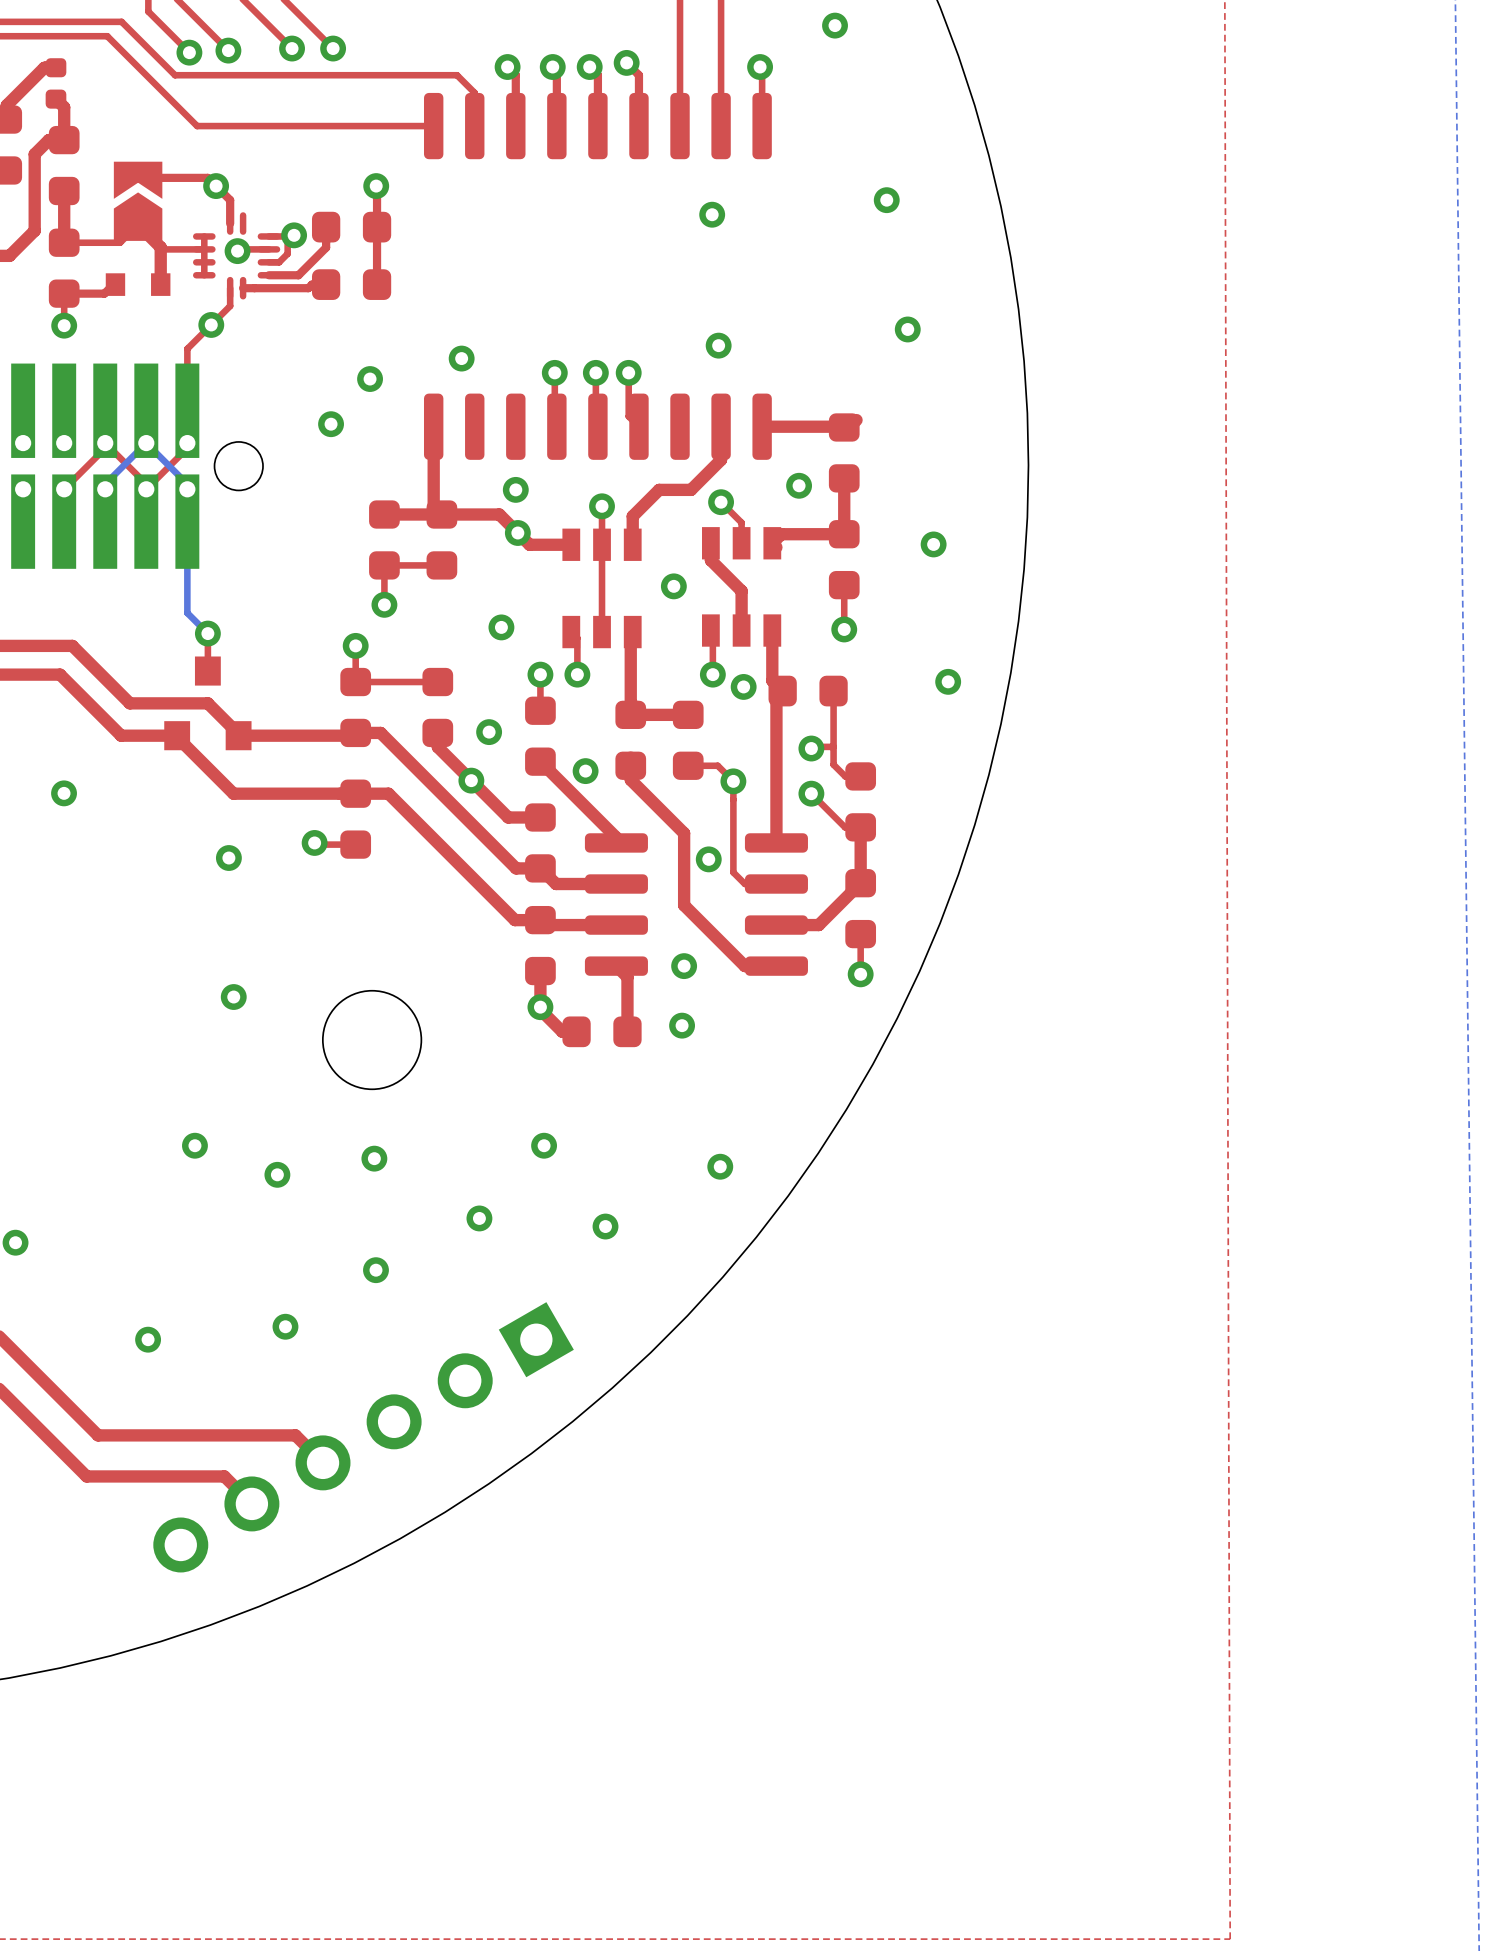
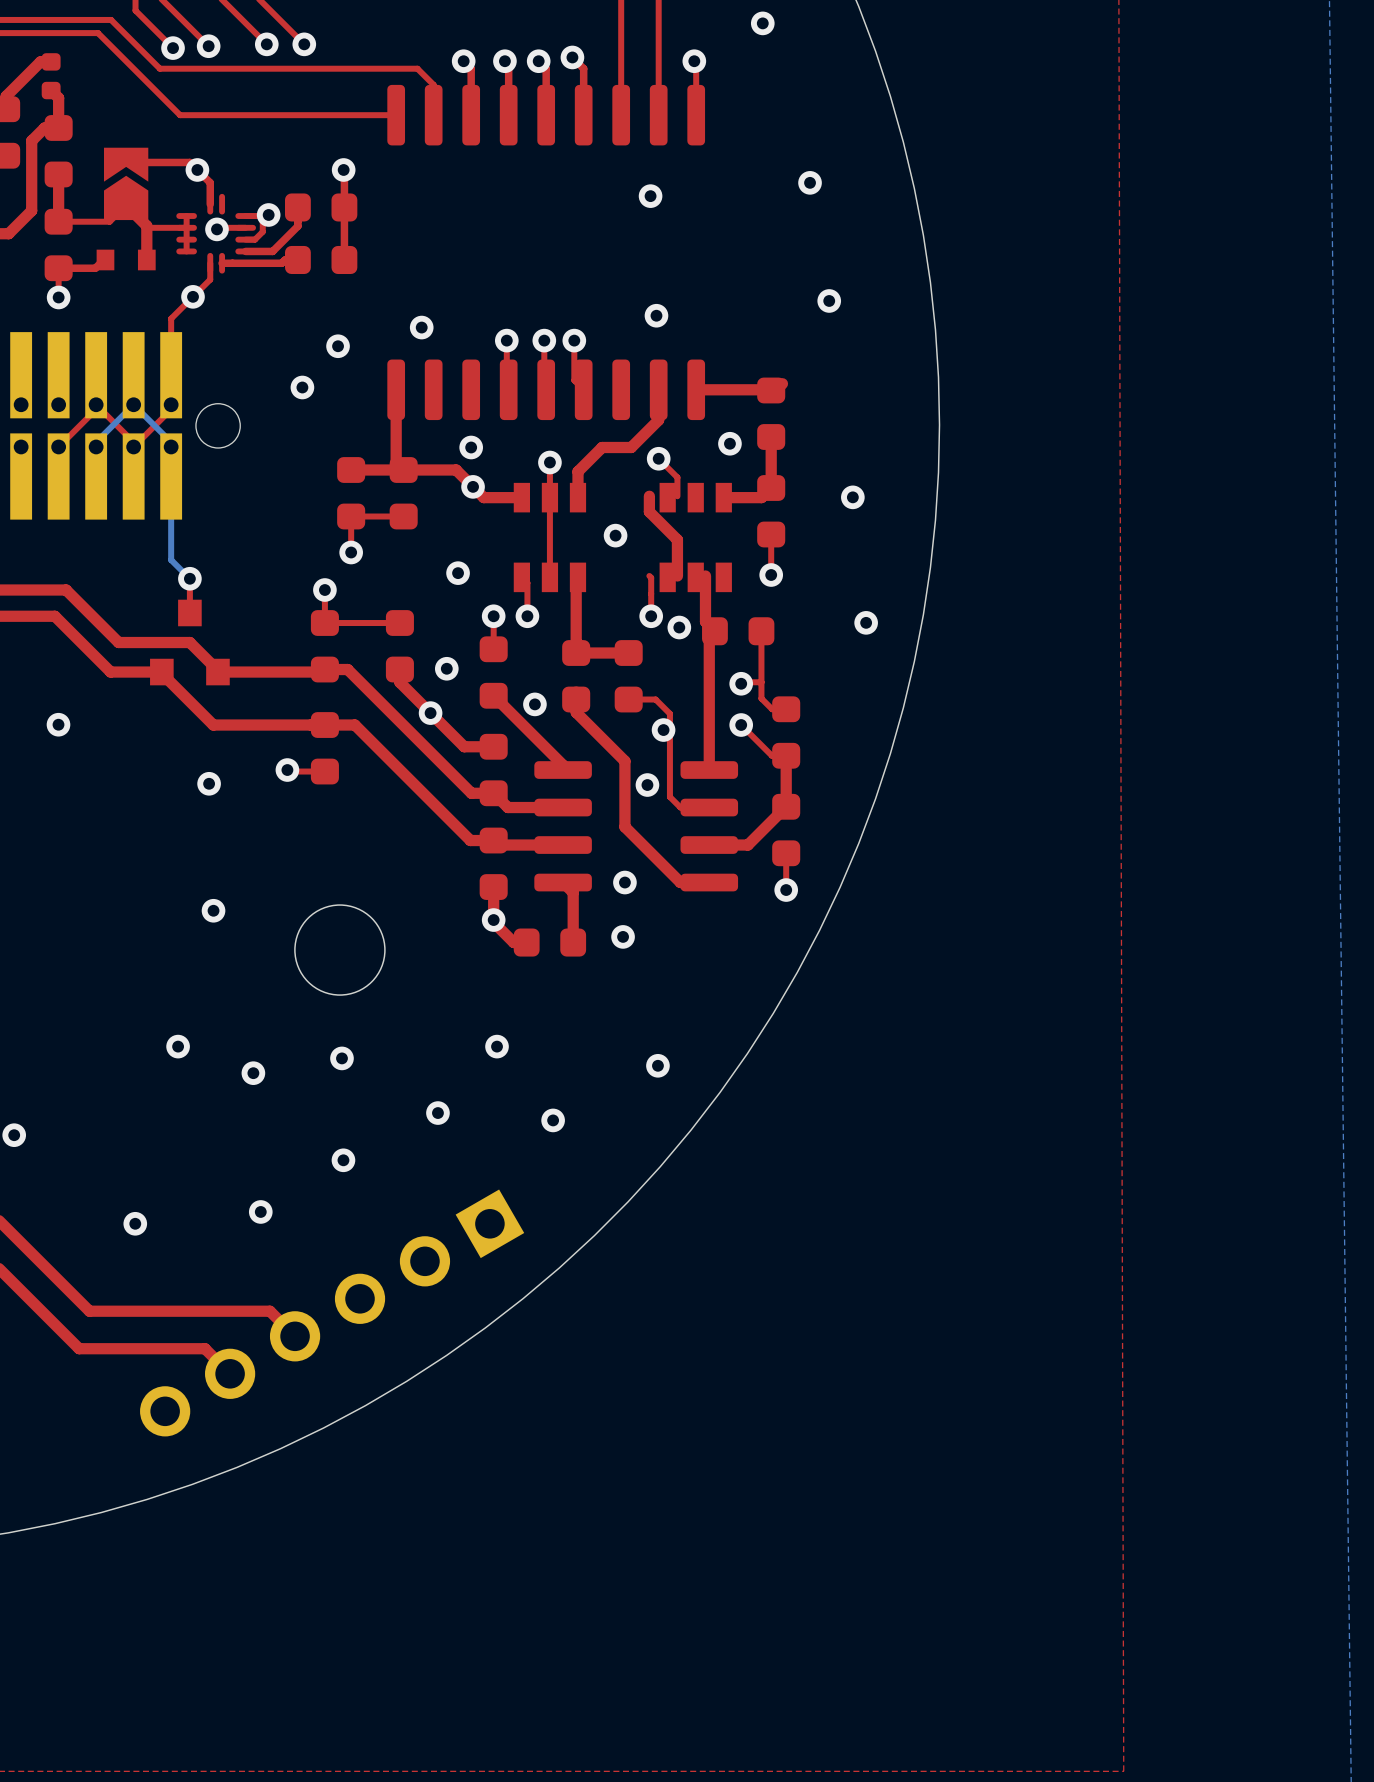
top track: (844, 534) (781, 534) (772, 543) (776, 547) -> (771, 488) (761, 497) (723, 497)
part position: (741, 586) -> (695, 537)
via position: (733, 781) -> (663, 730)

